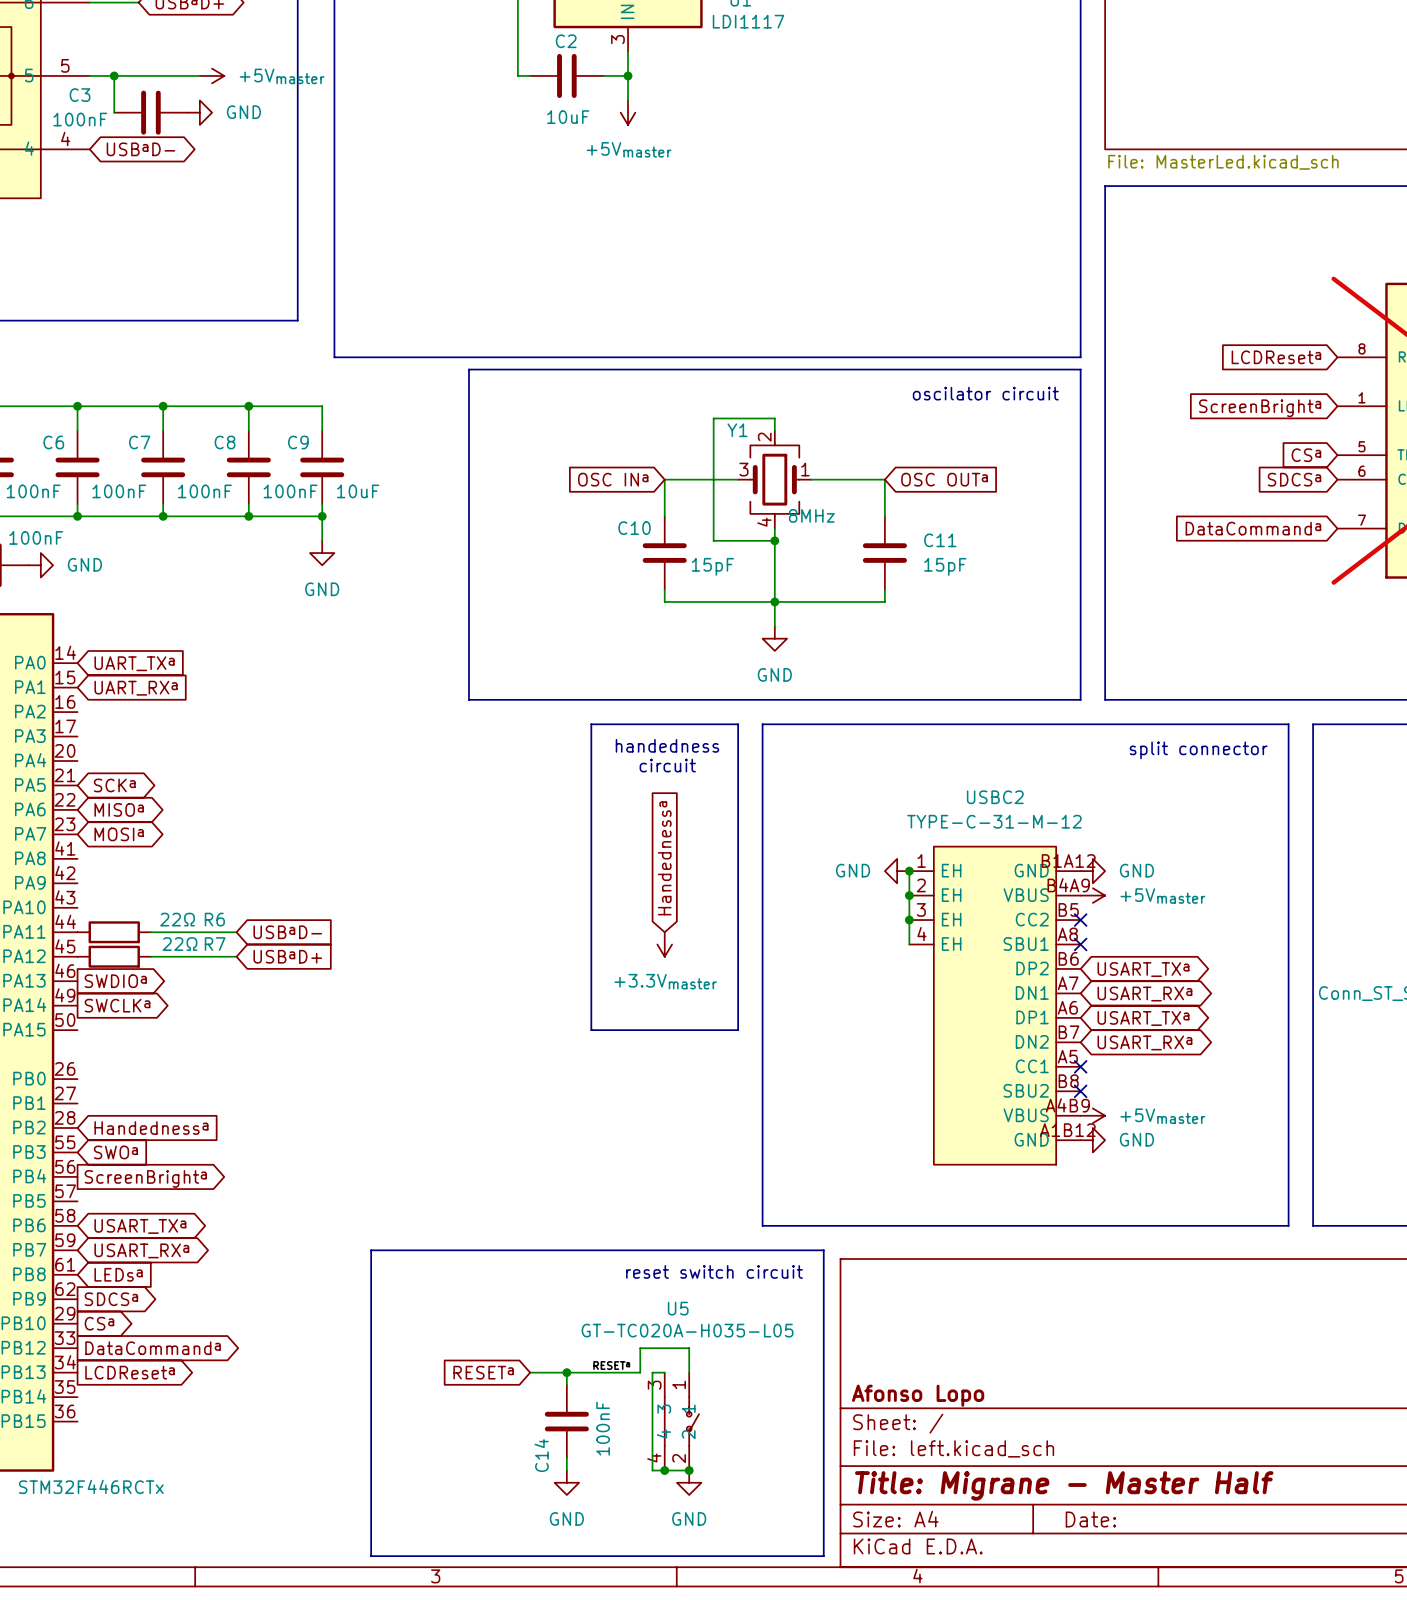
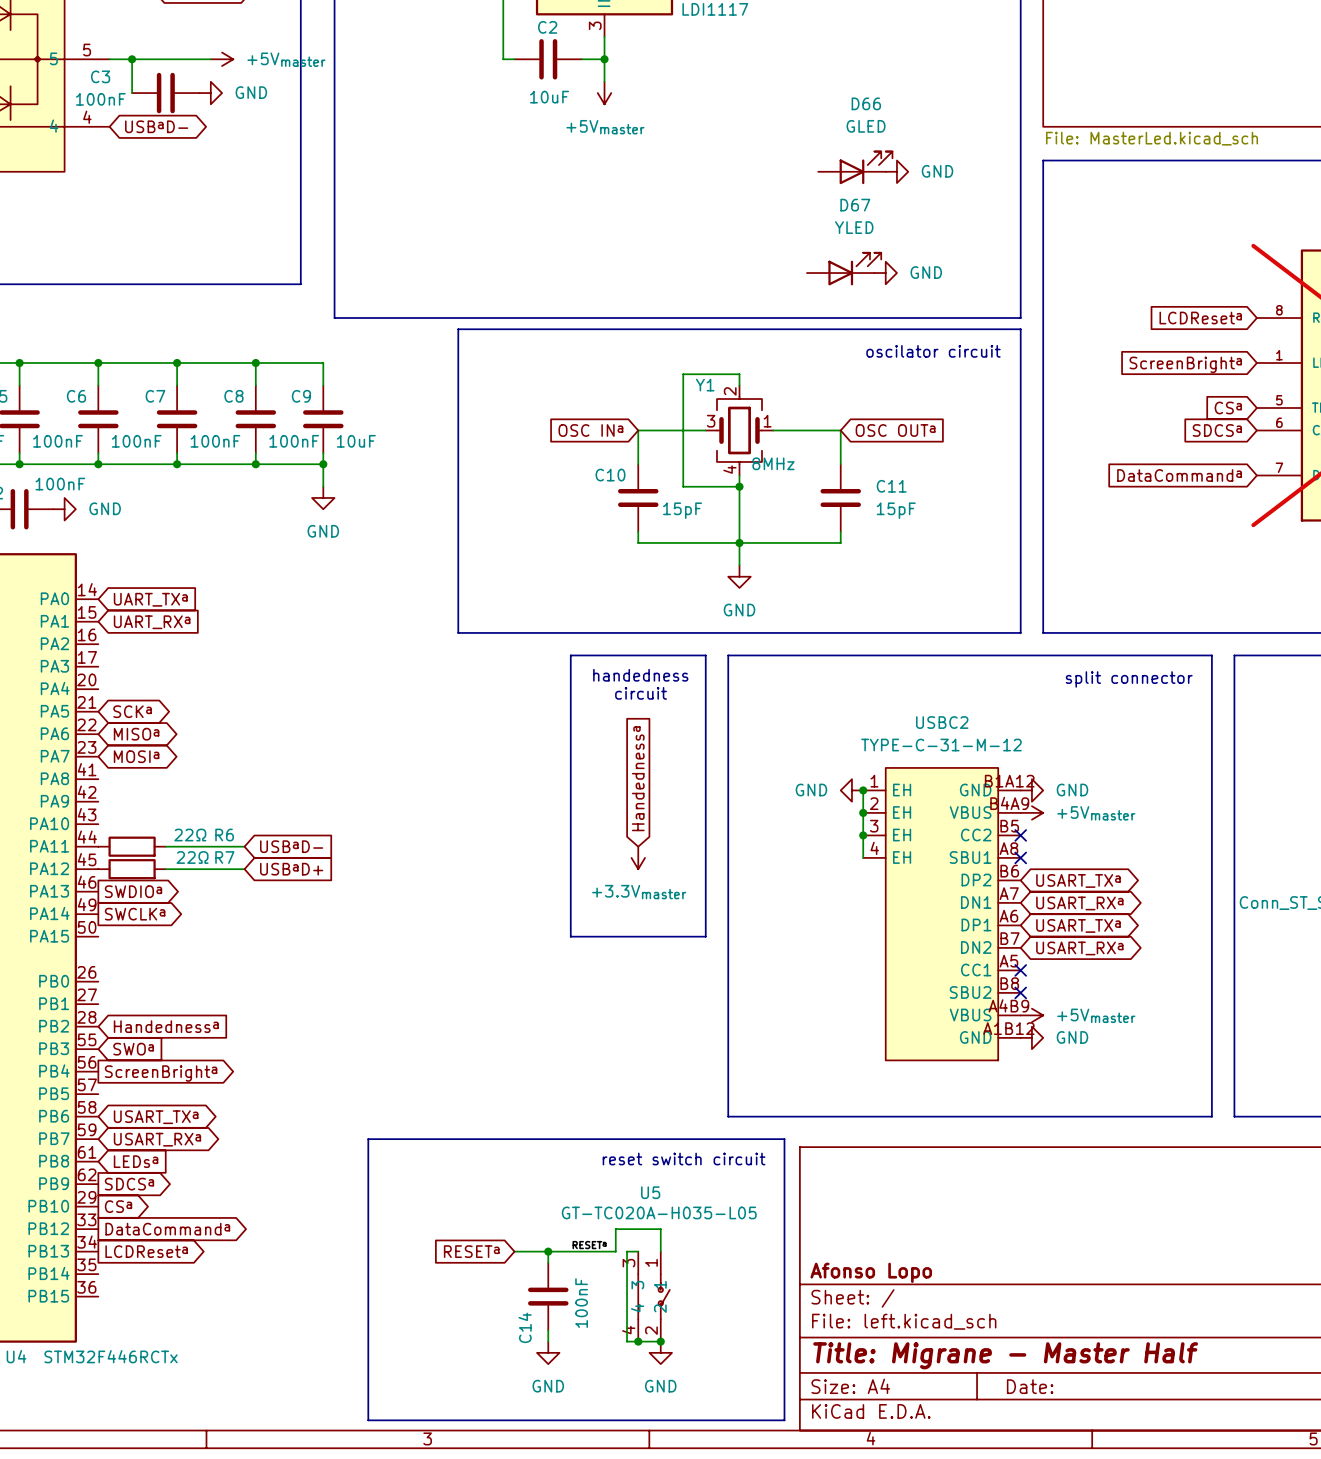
D66: none -> GLED (855, 167)
power symbol: none -> GND (896, 171)
D67: none -> YLED (844, 269)
power symbol: none -> GND (885, 273)

